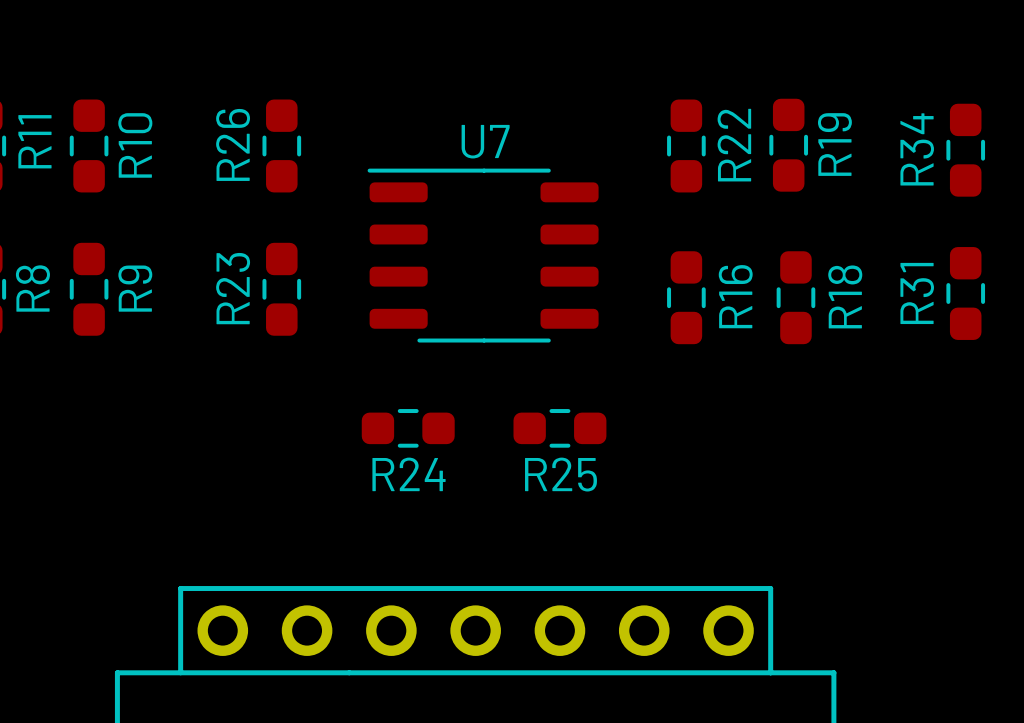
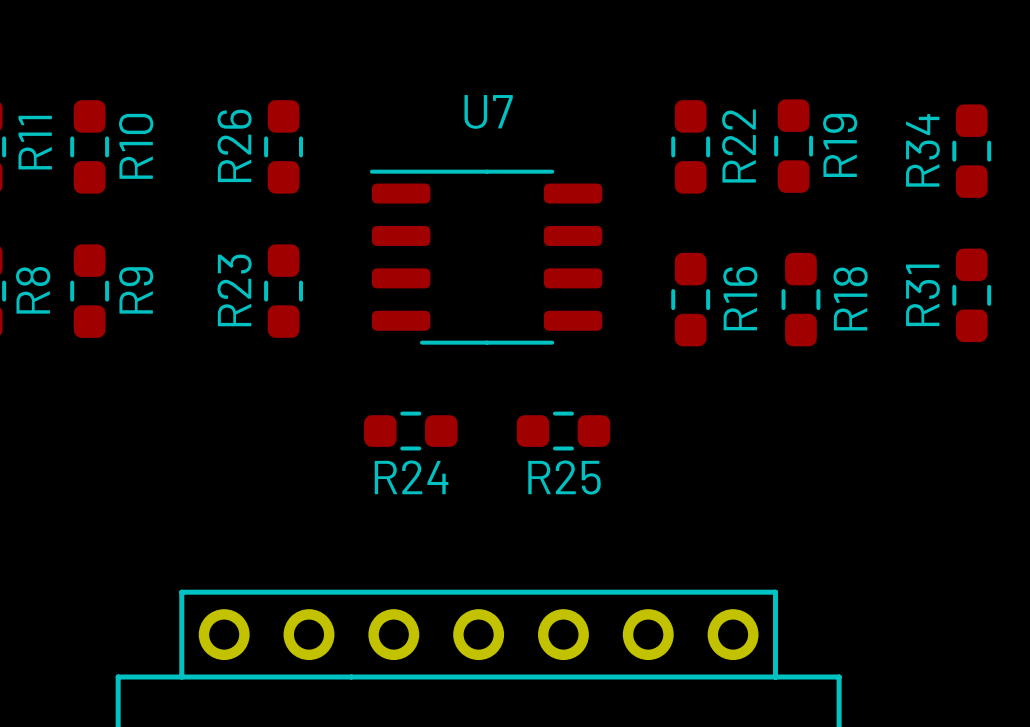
U7 name position: U7 (485, 141) -> U7 (488, 111)

